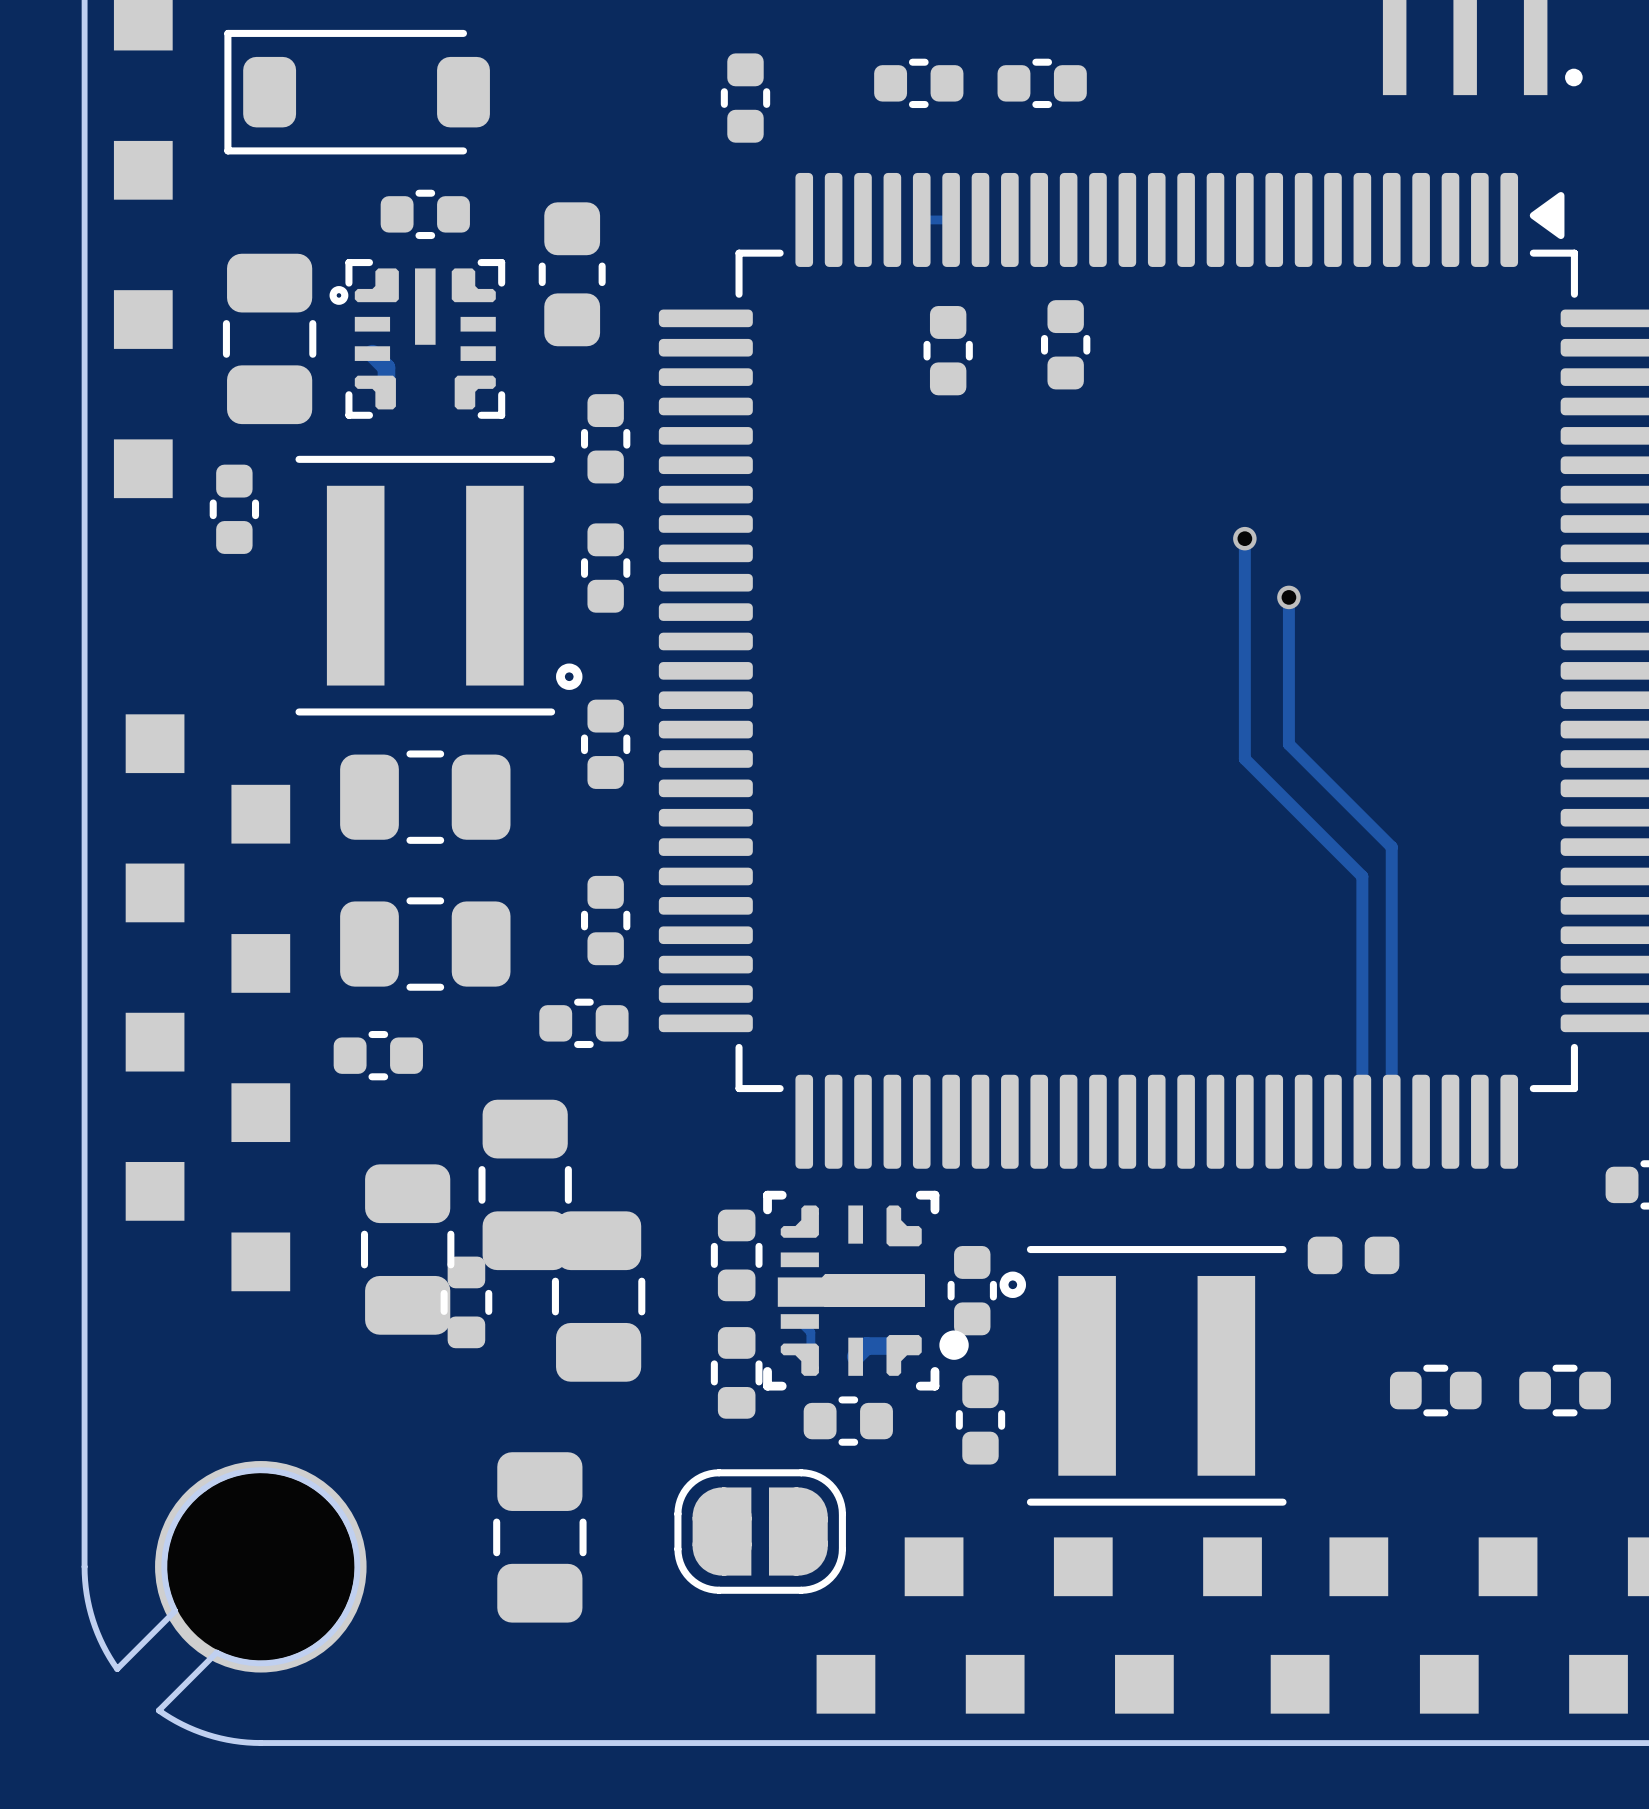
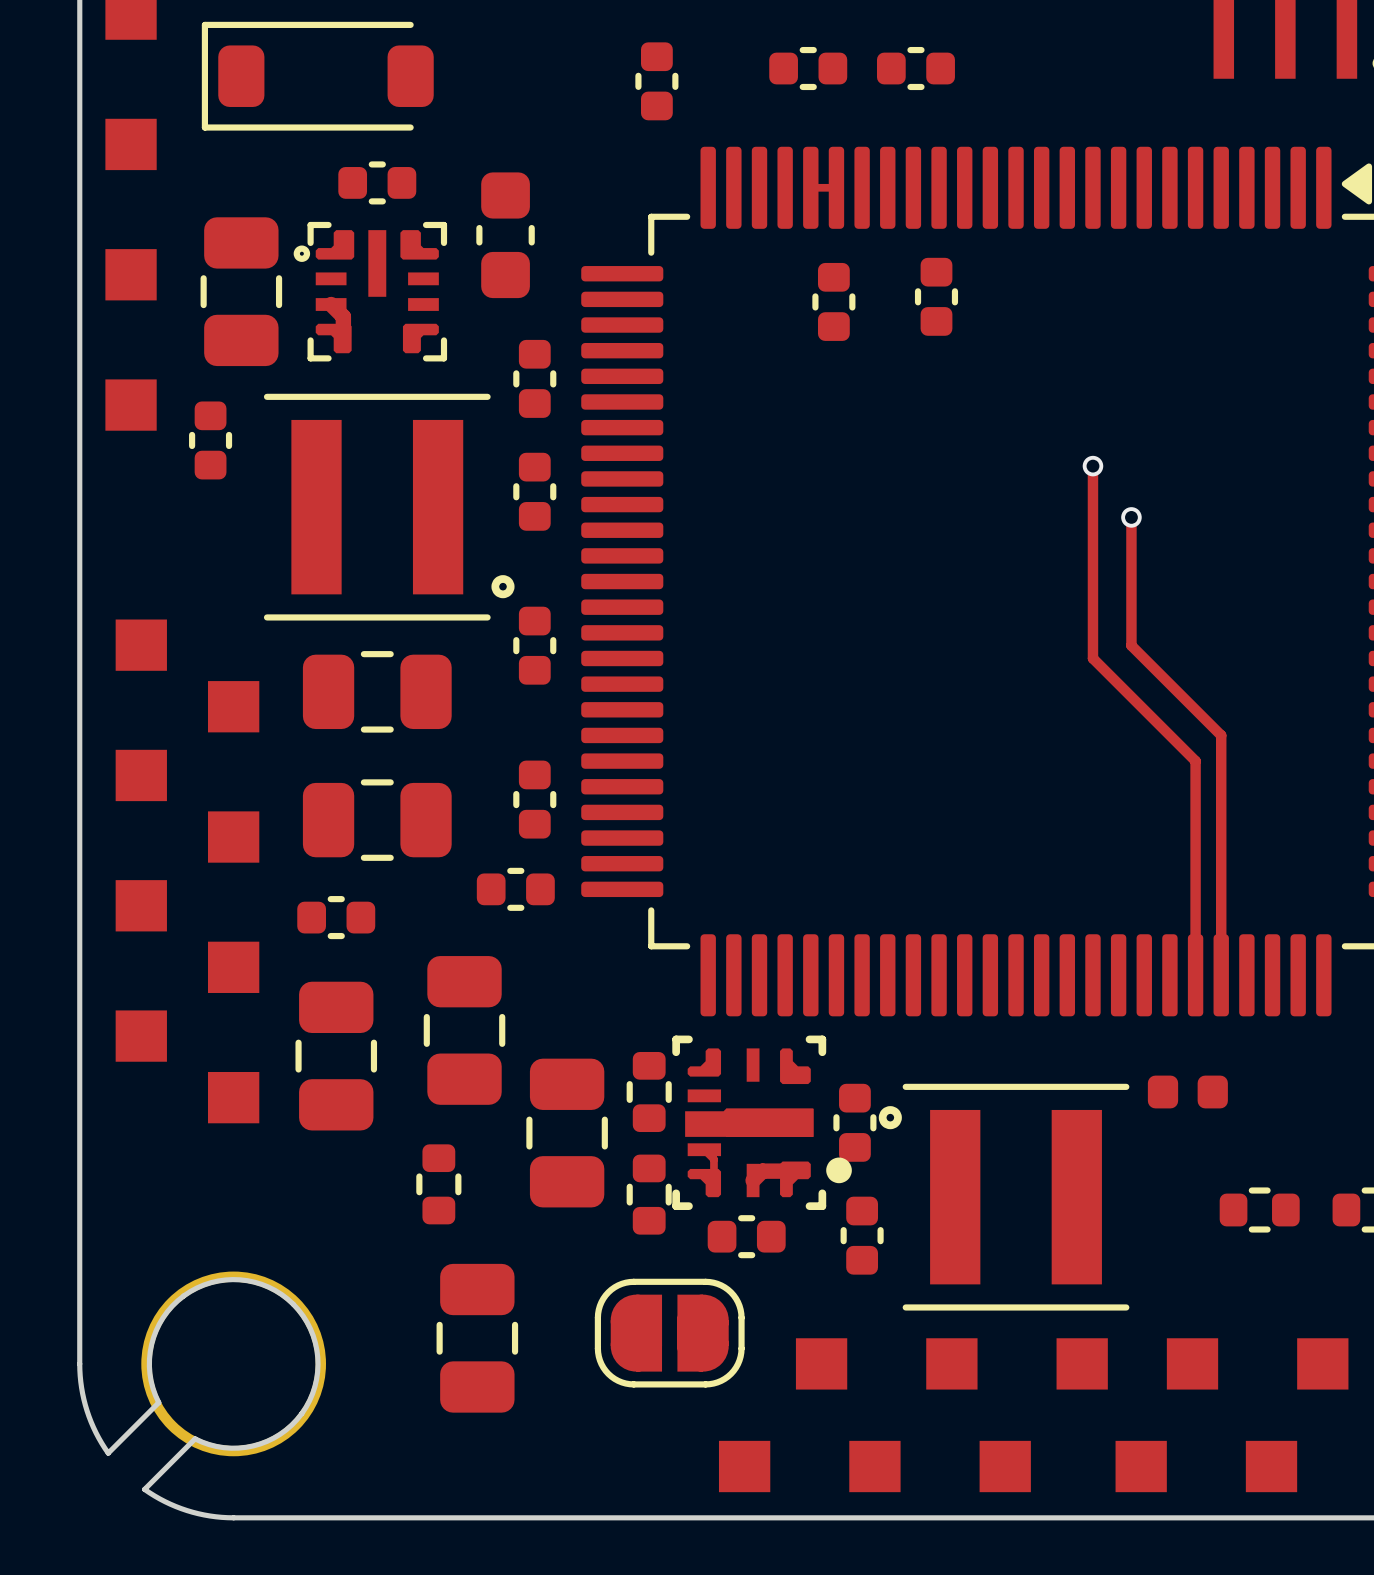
part position: (407, 1249) -> (336, 1056)
part position: (598, 1296) -> (567, 1133)
part position: (466, 1302) -> (438, 1184)

